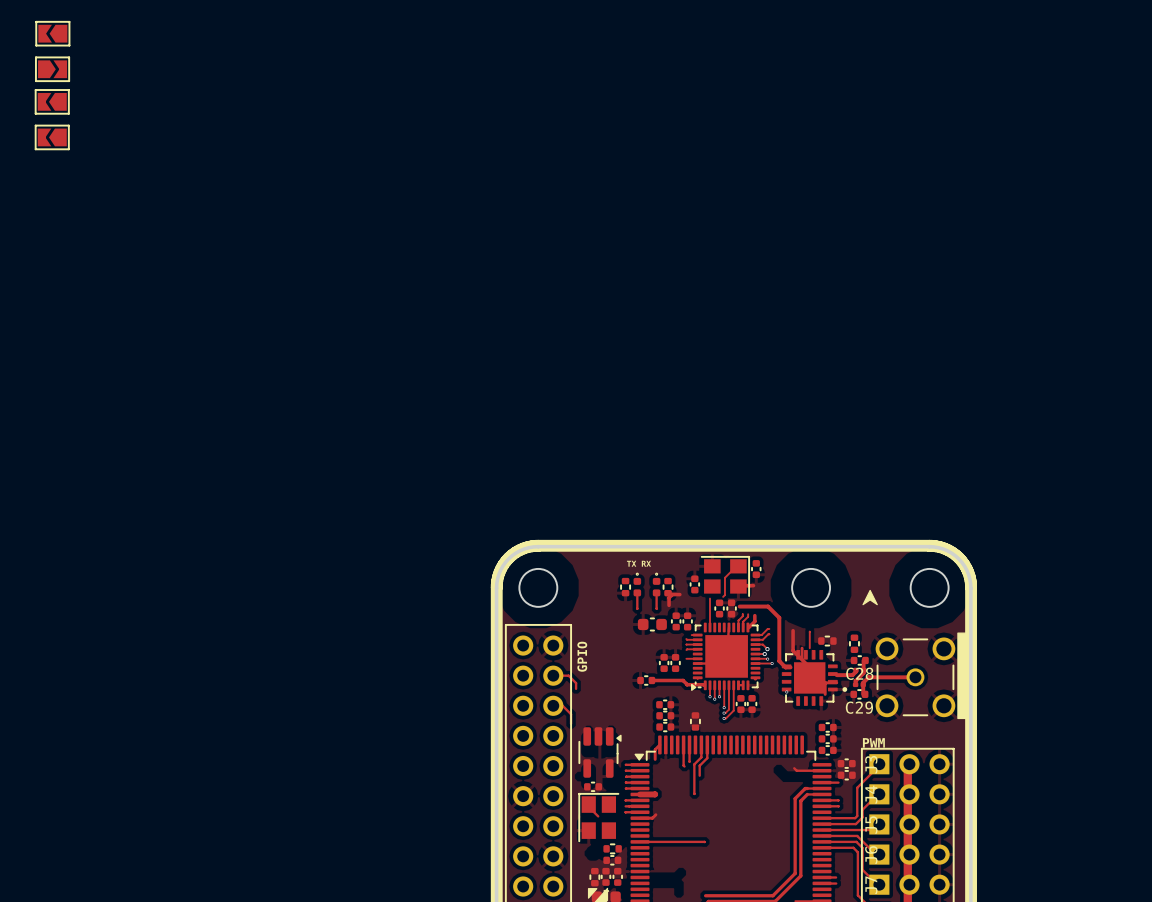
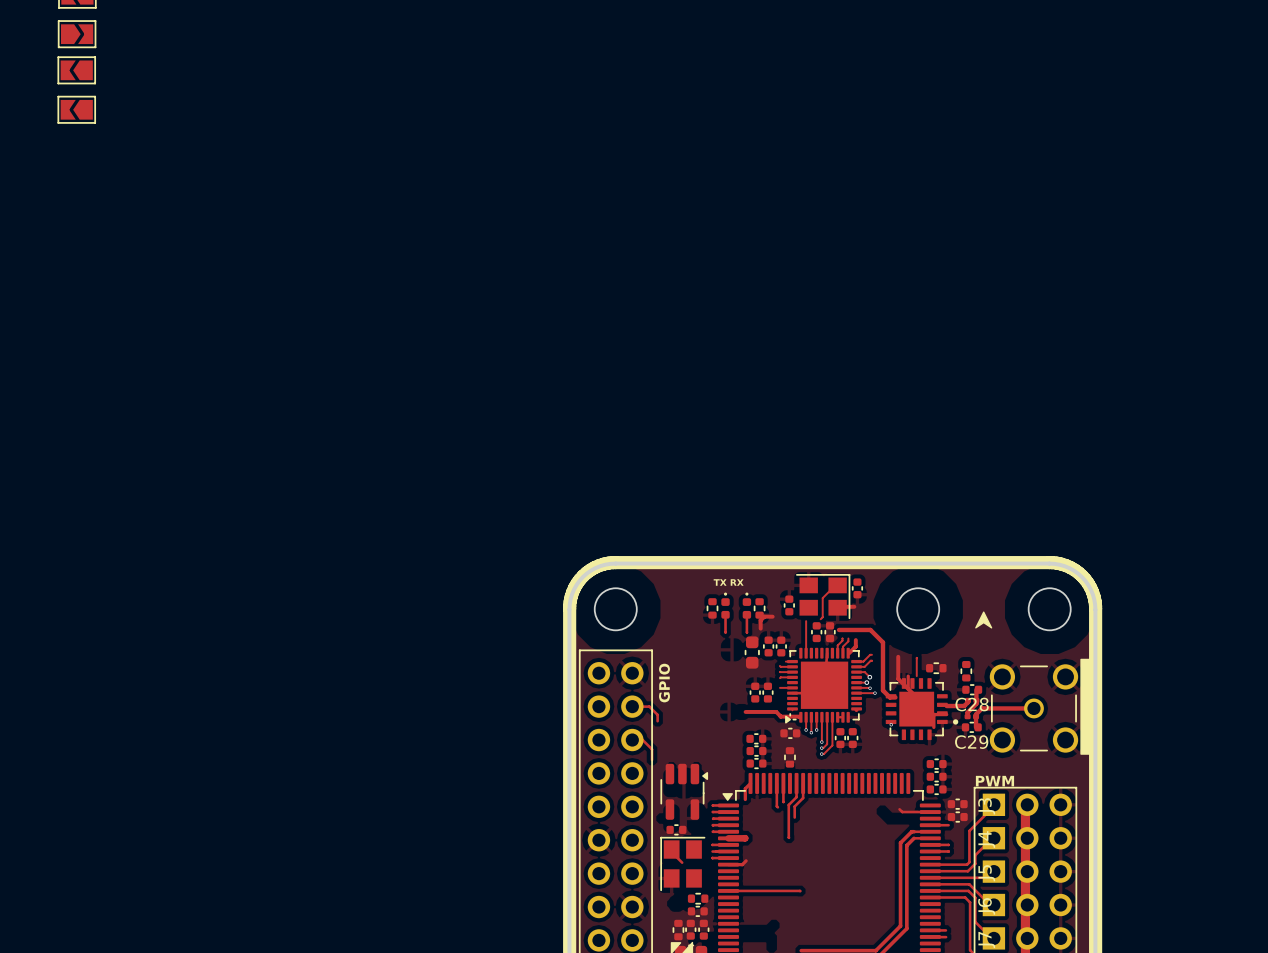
part rotation: 0° (652, 624) -> 90° clockwise (752, 652)
part position: (646, 680) -> (790, 733)

